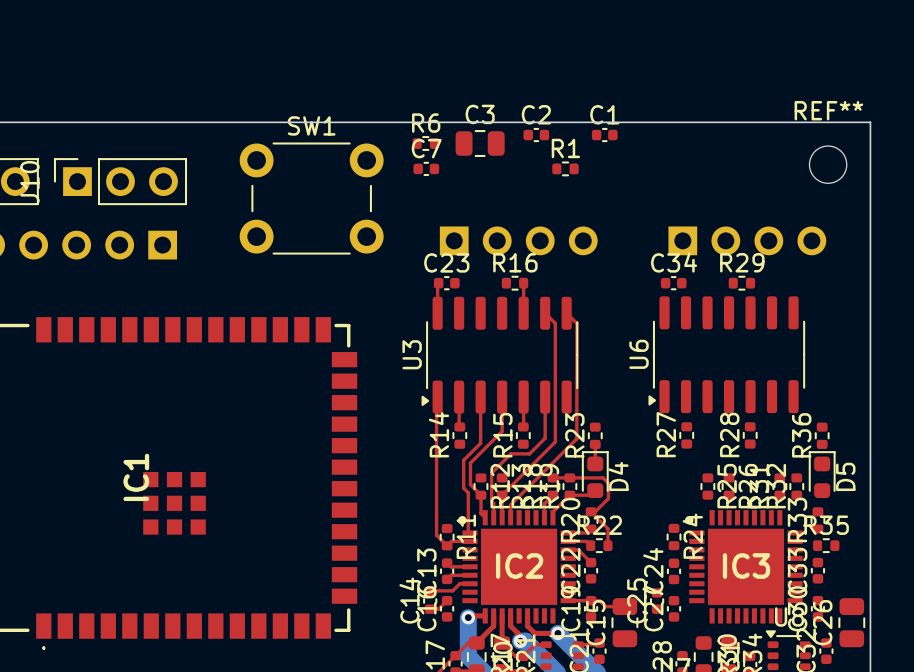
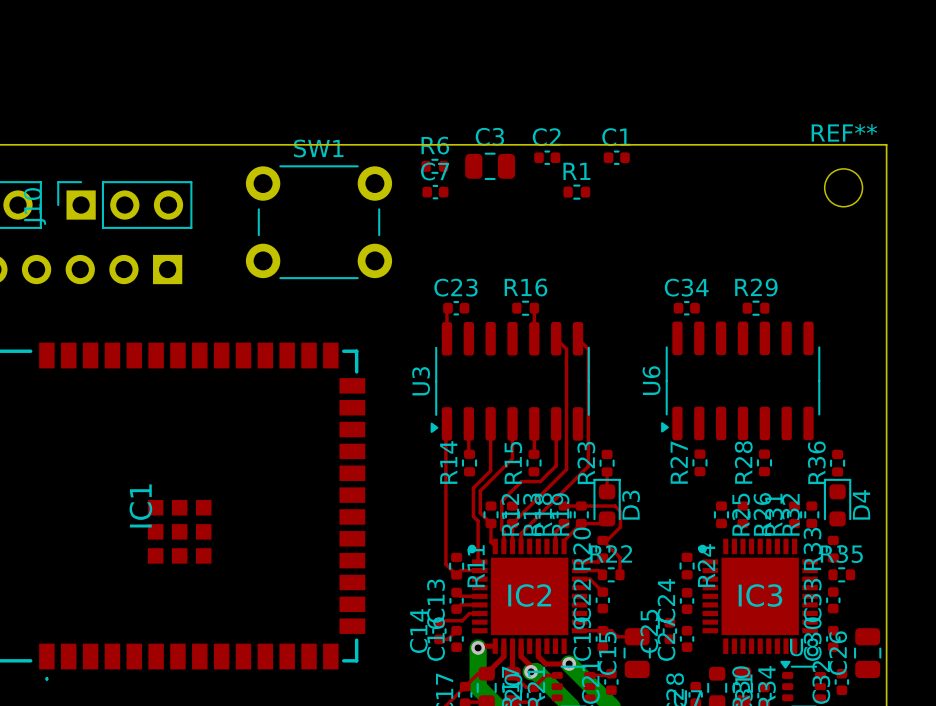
part: (518, 240) -> none
part: (747, 240) -> none
D4 name: D4 (618, 476) -> D3 (631, 505)
D5 name: D5 (845, 476) -> D4 (861, 504)

